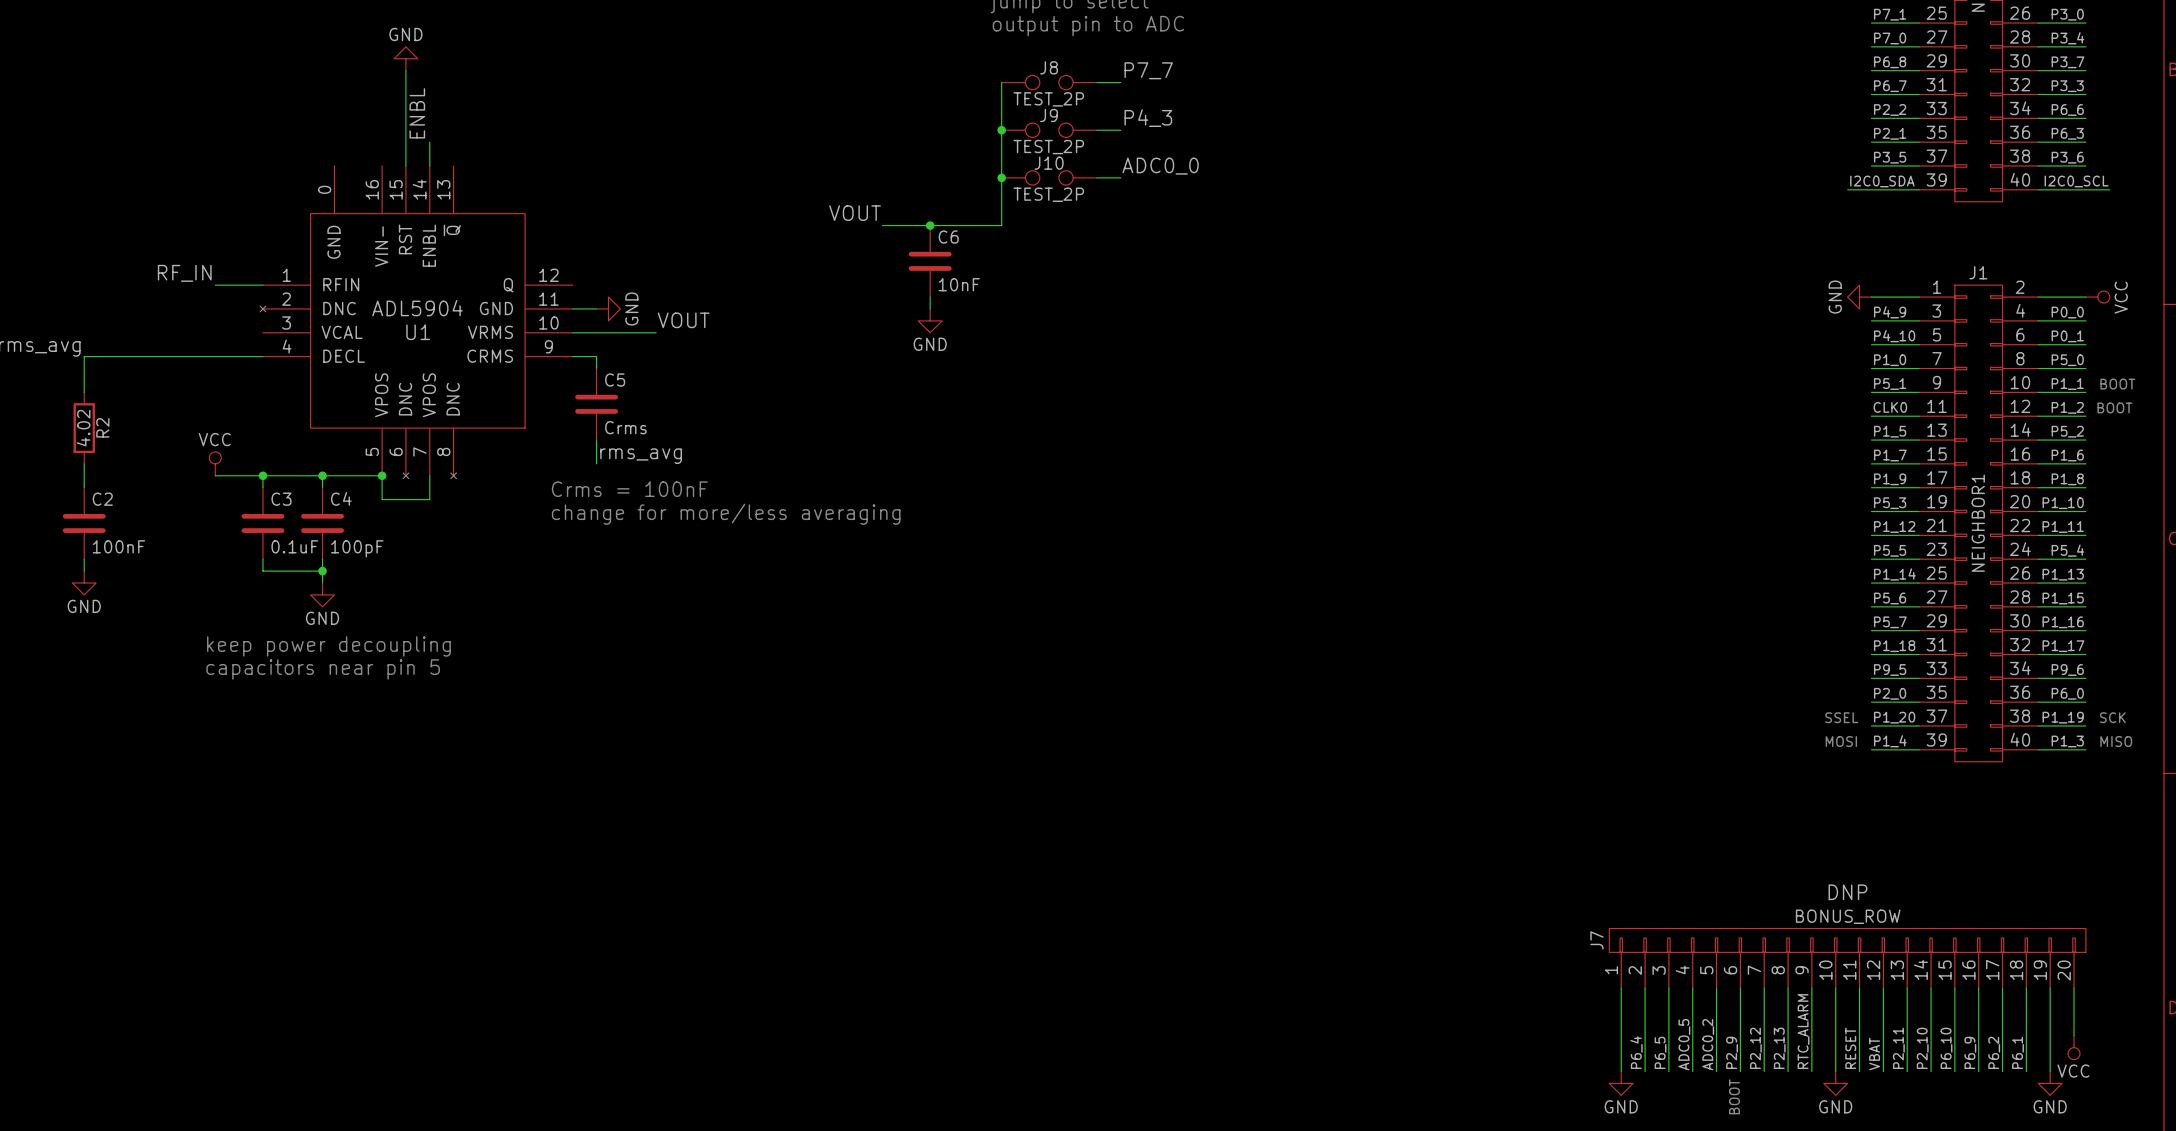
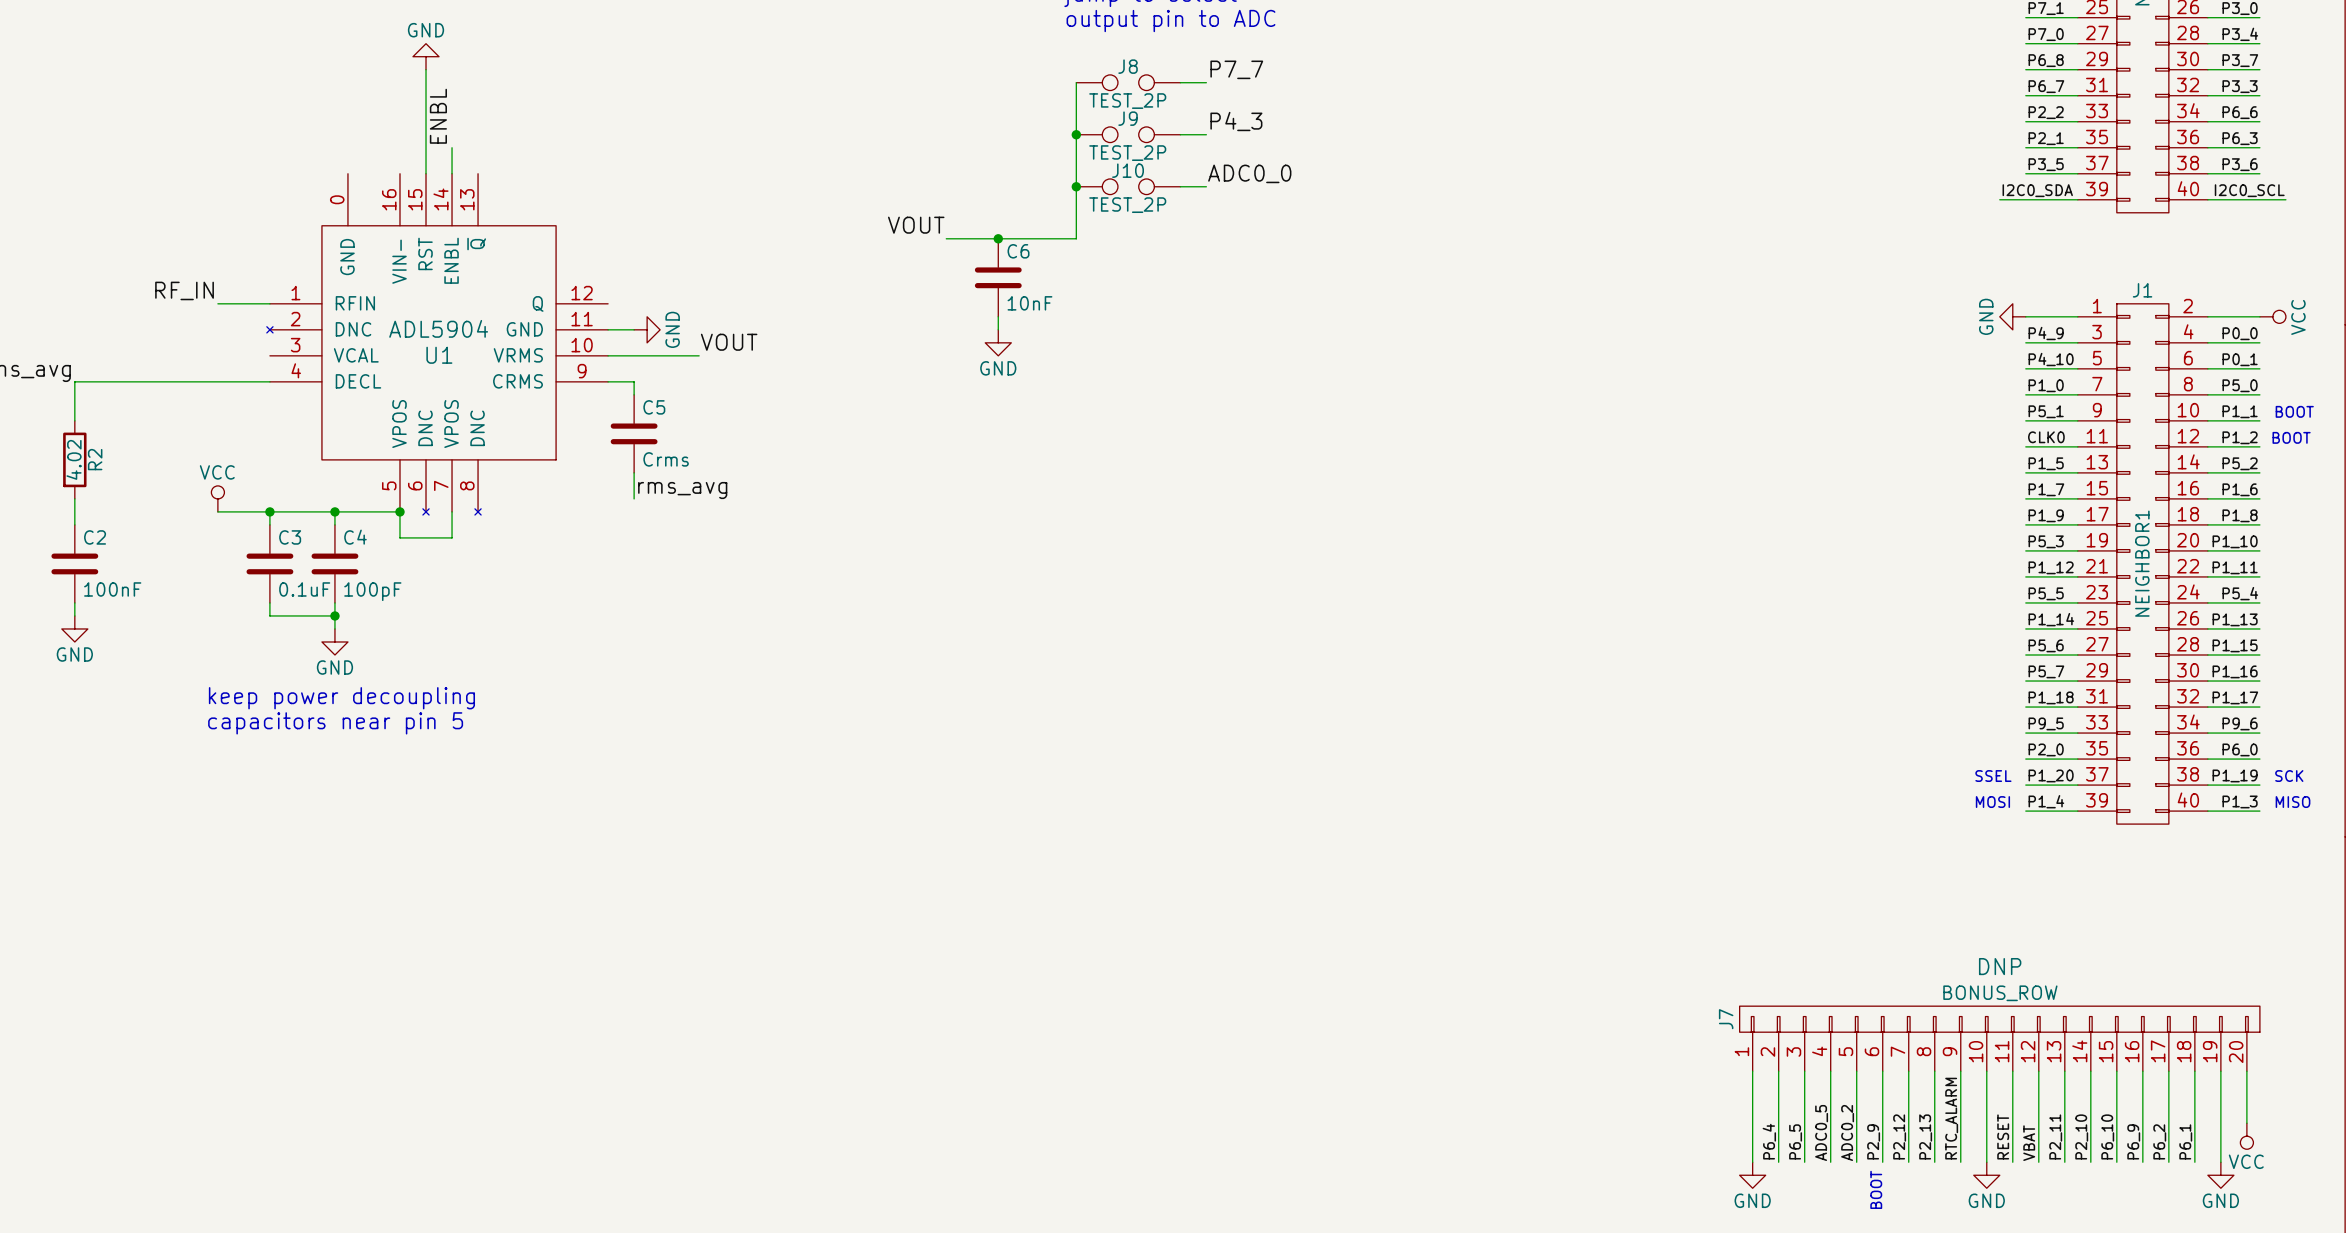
text: Crms = 100nF (629, 489) -> none
text: change for more/less averaging (726, 514) -> none

